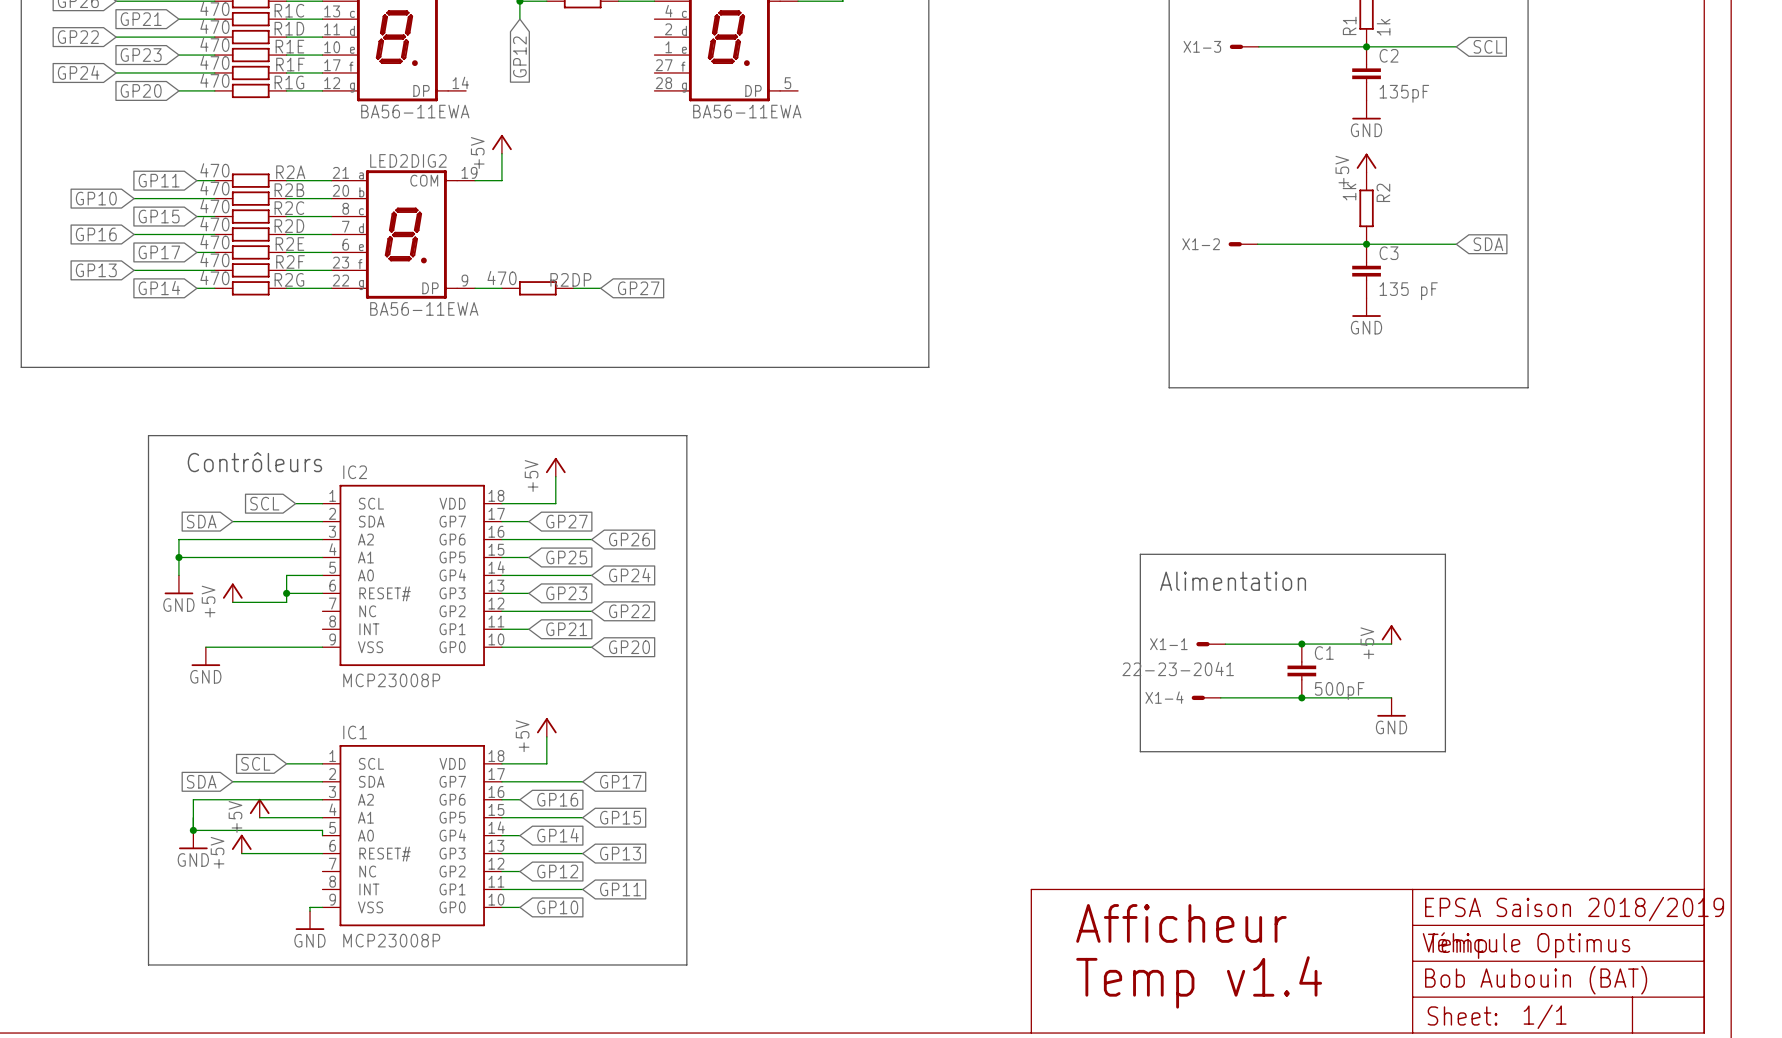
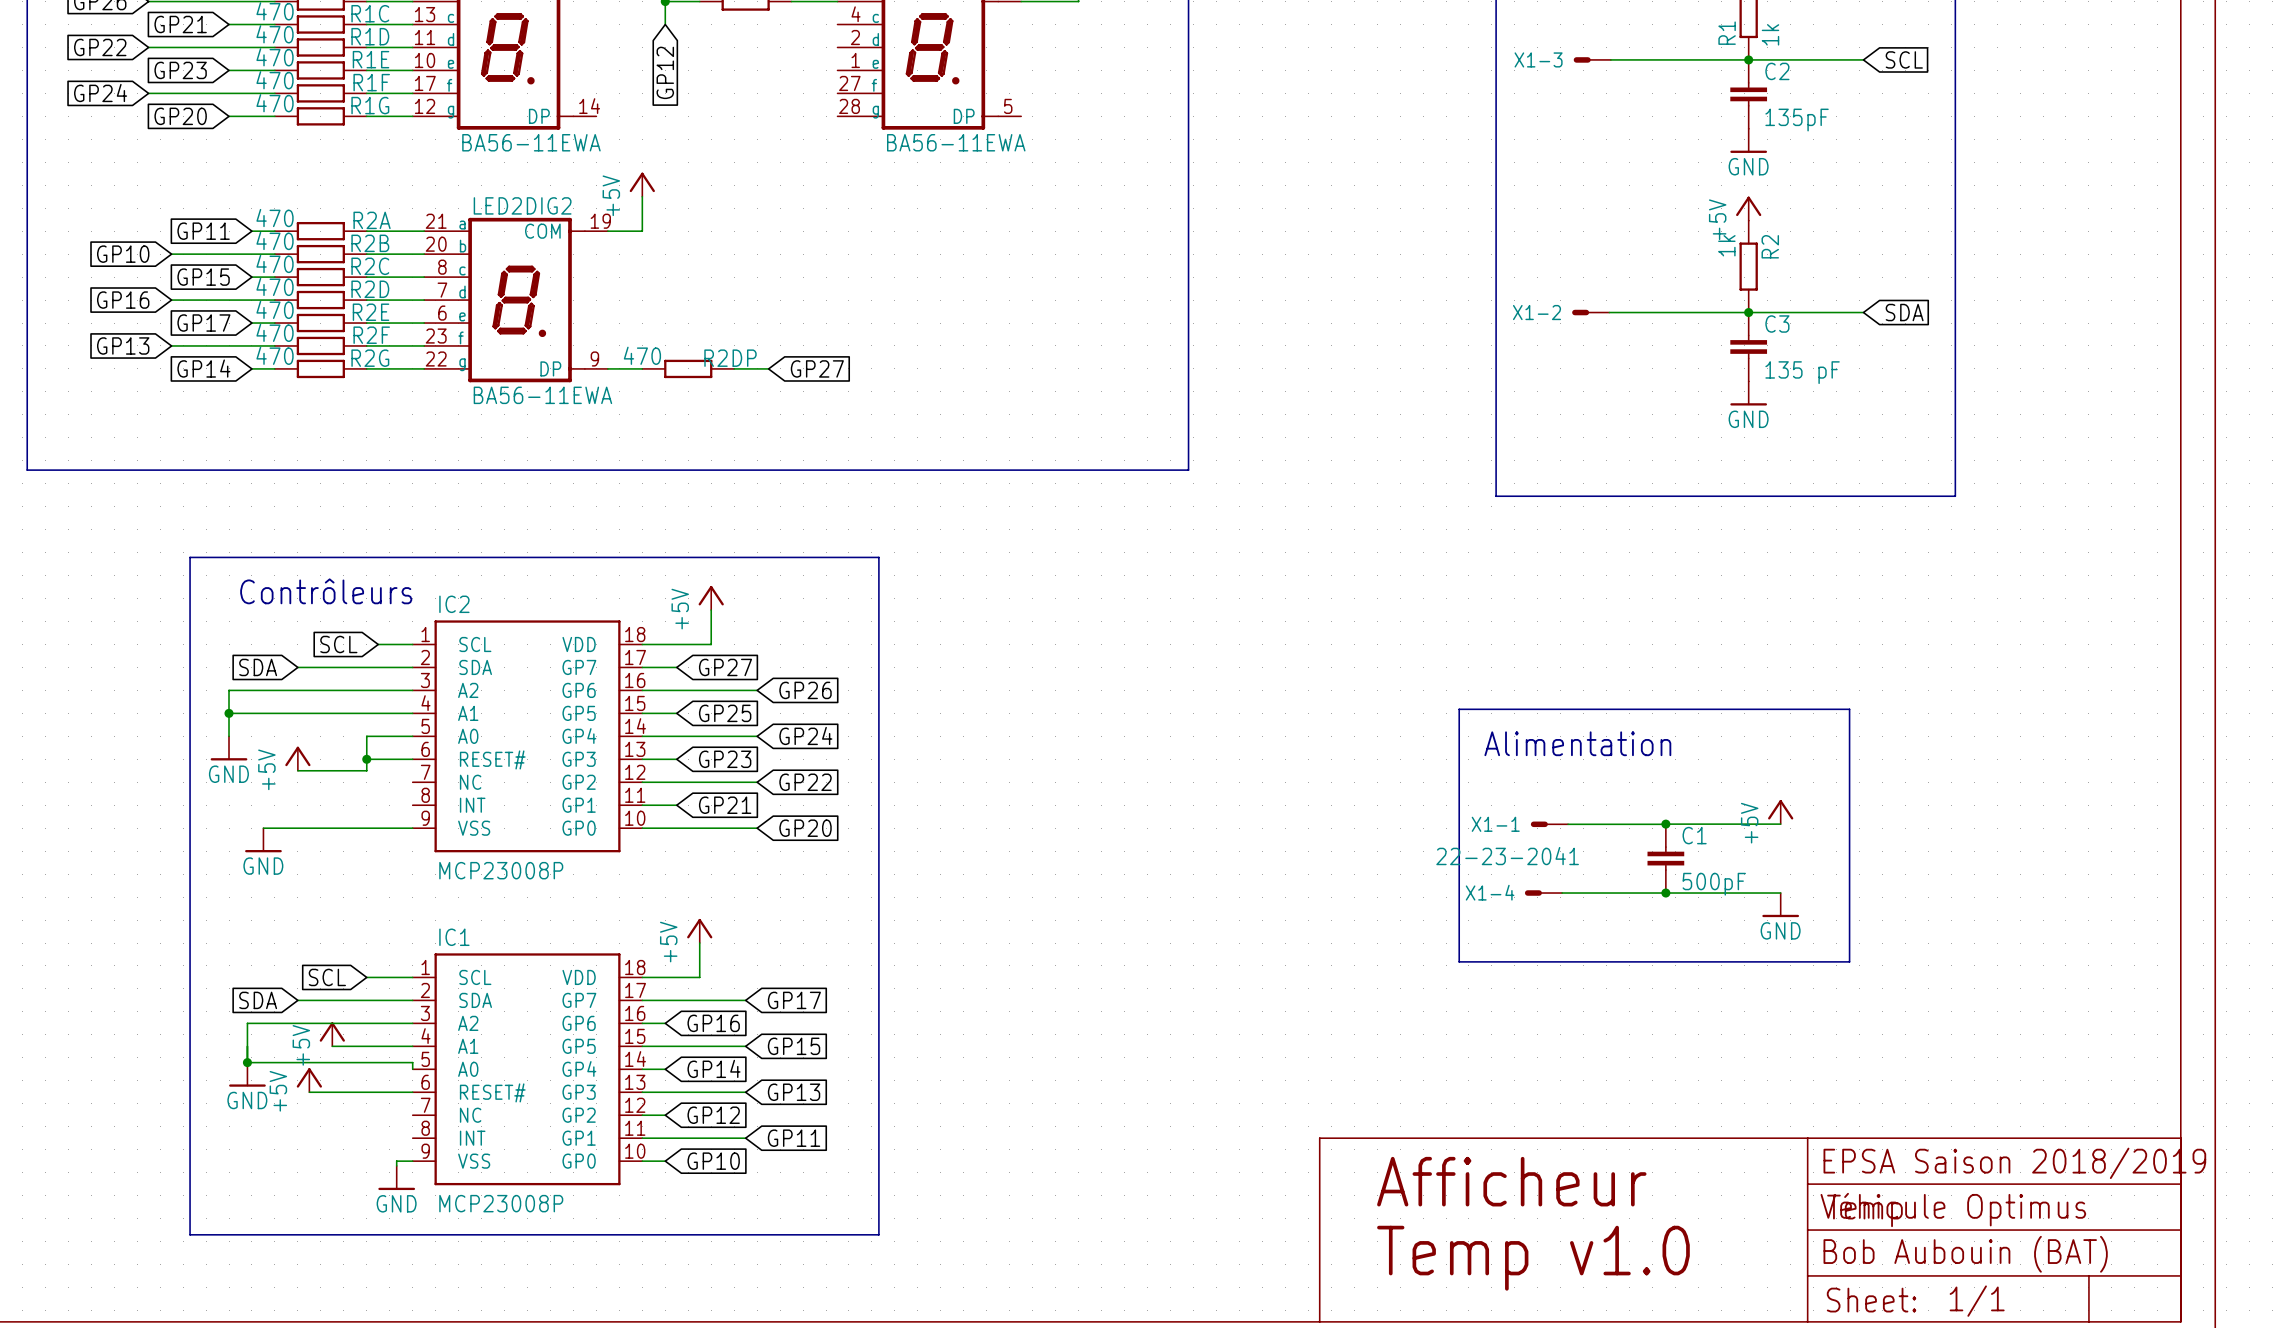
text: Temp v1.4 (1199, 982) -> Temp v1.0 (1533, 1258)

